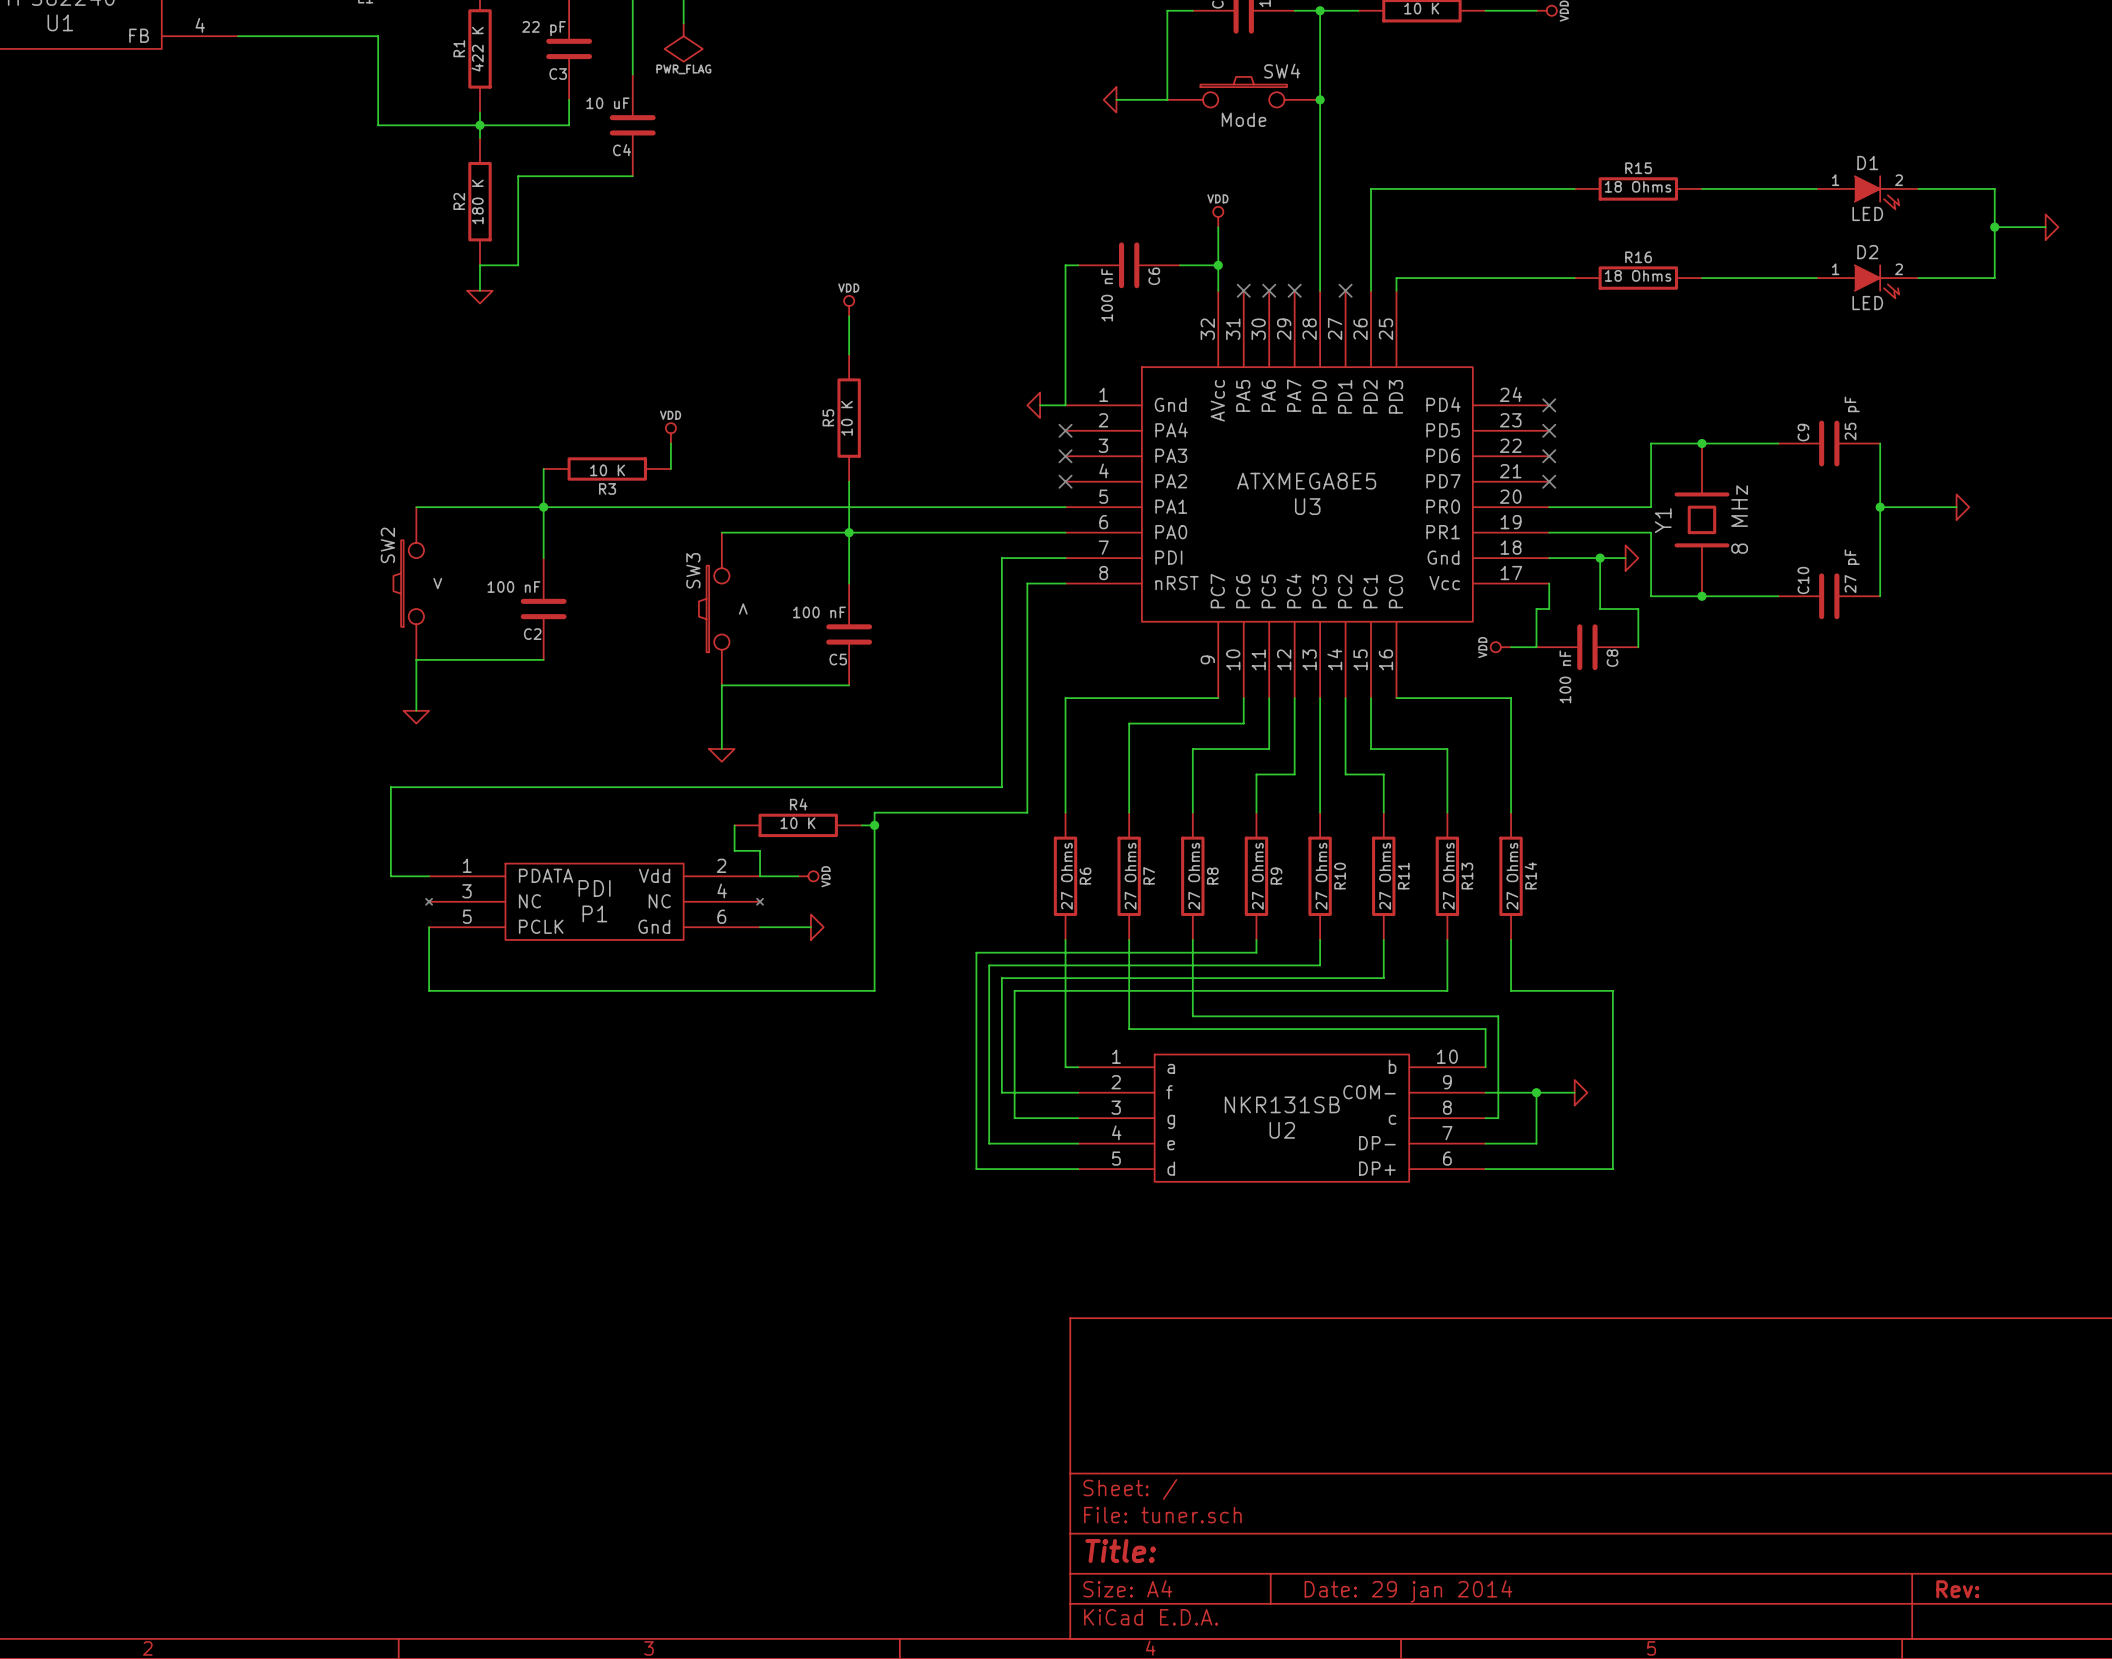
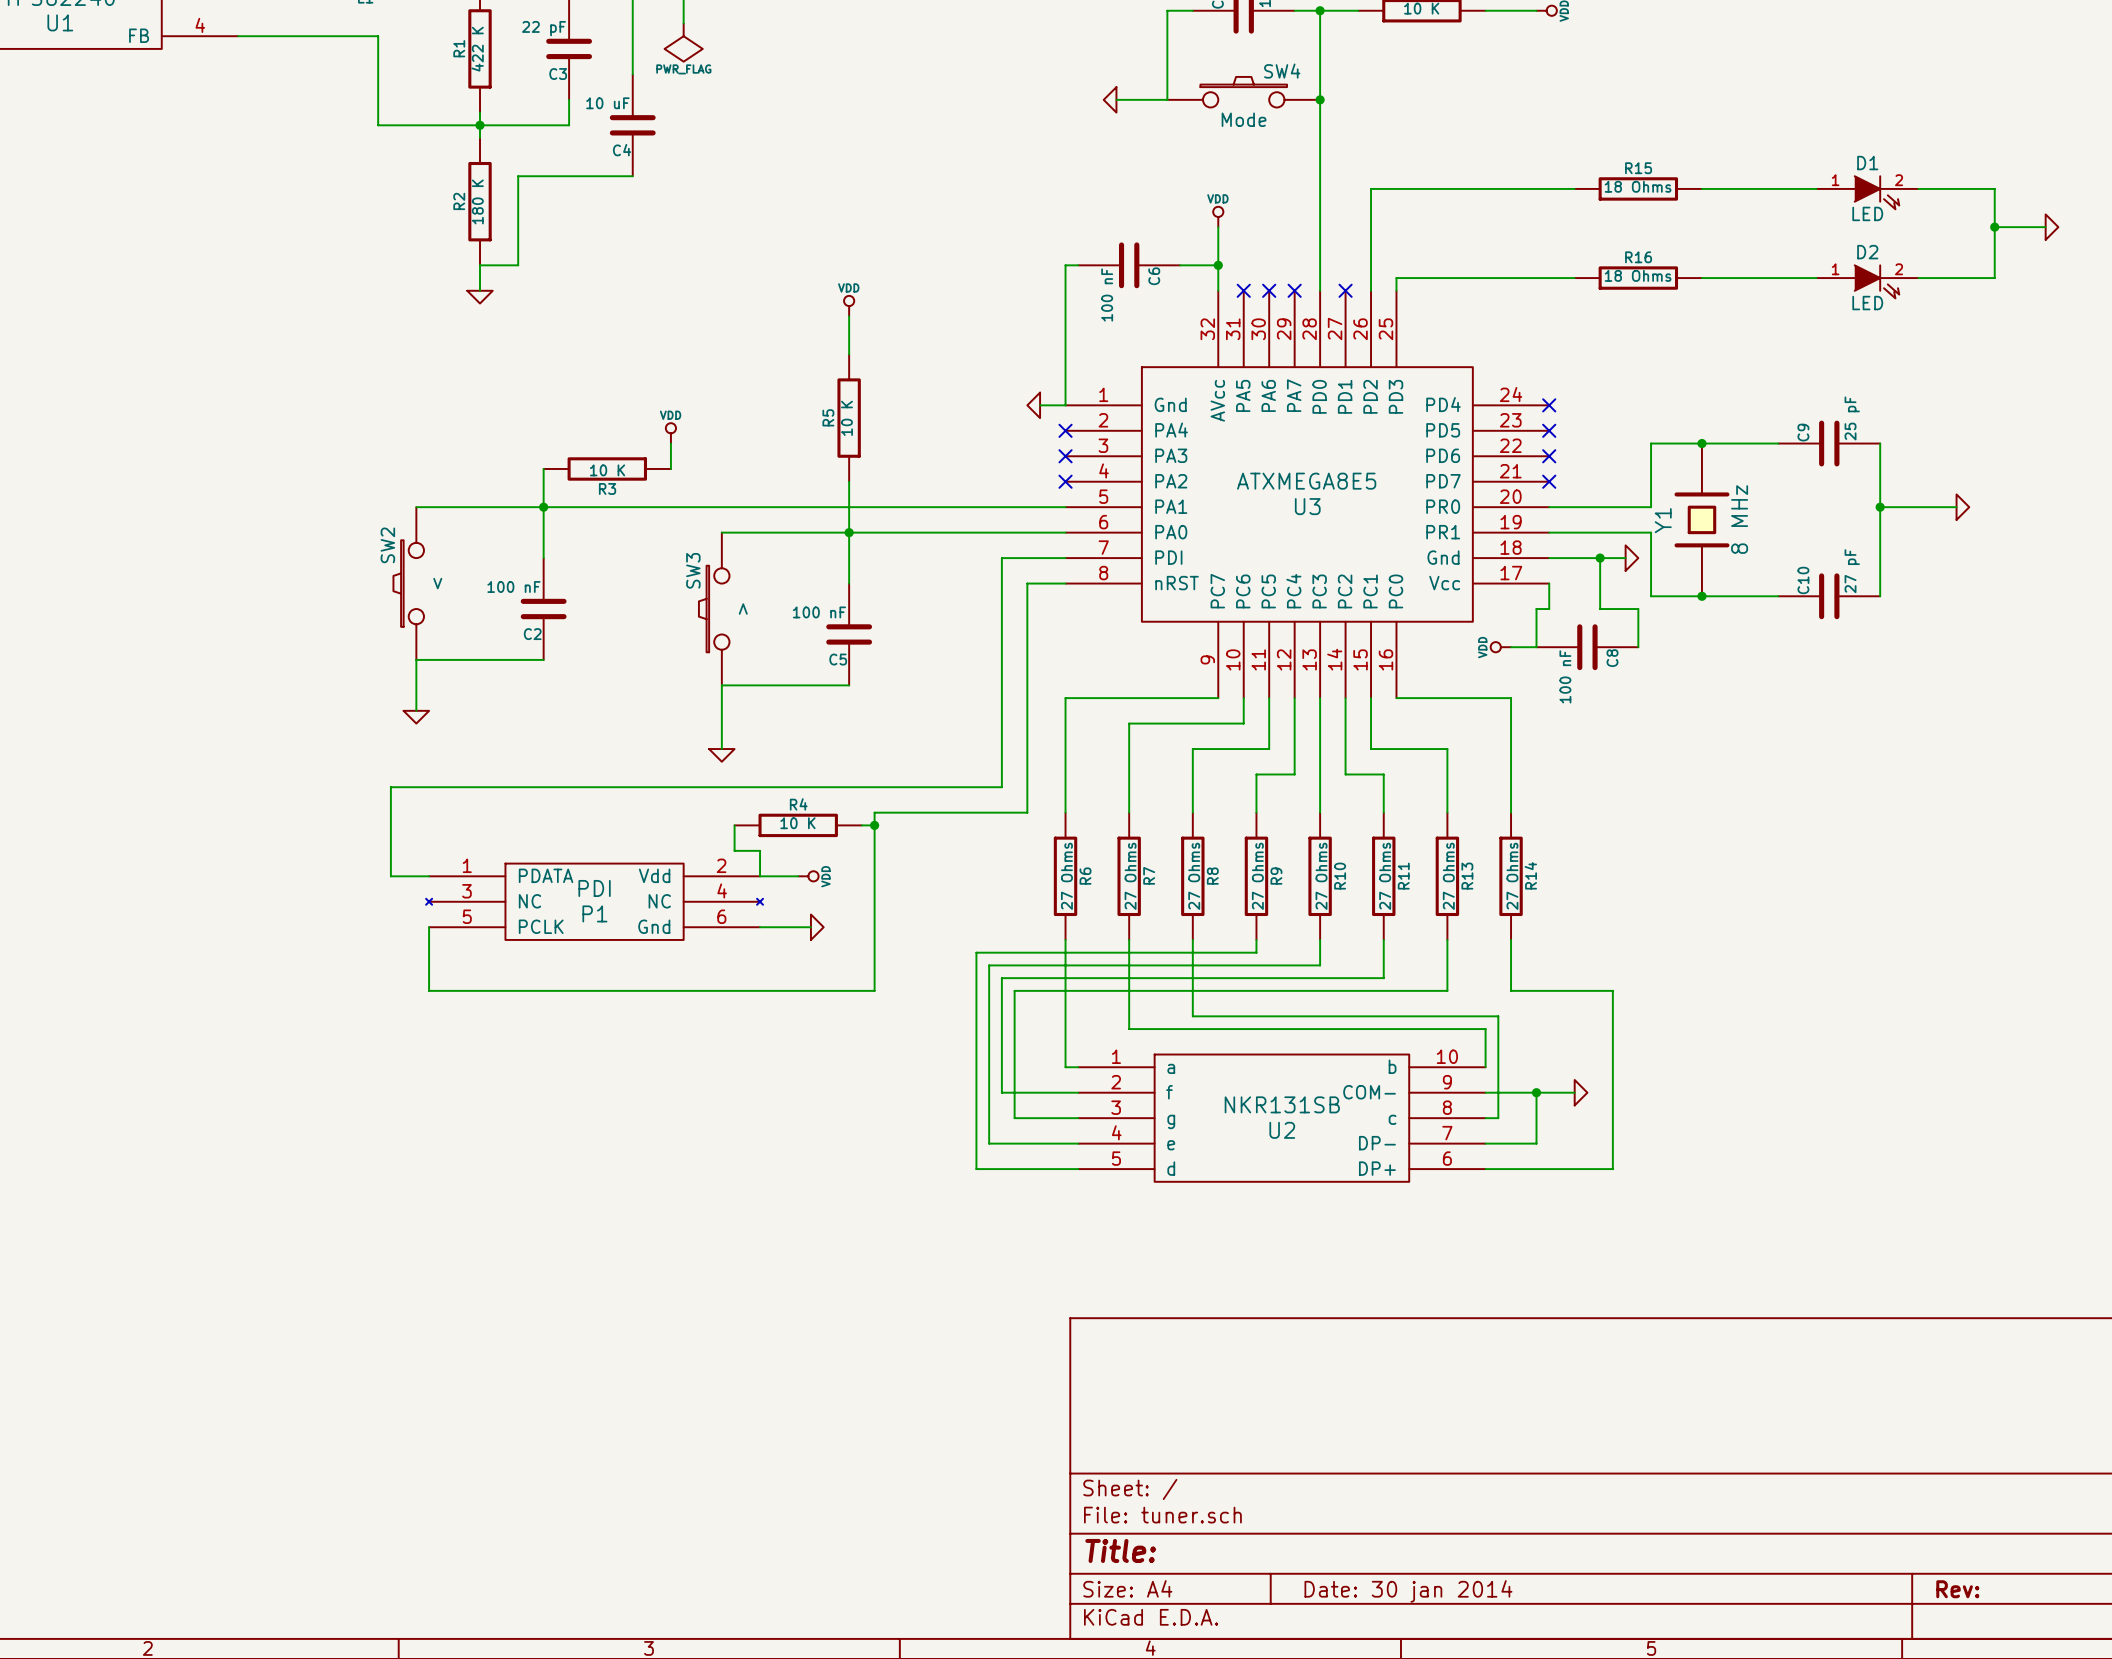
title block: Date: 29 jan 2014 (1408, 1591) -> Date: 30 jan 2014 (1408, 1591)

